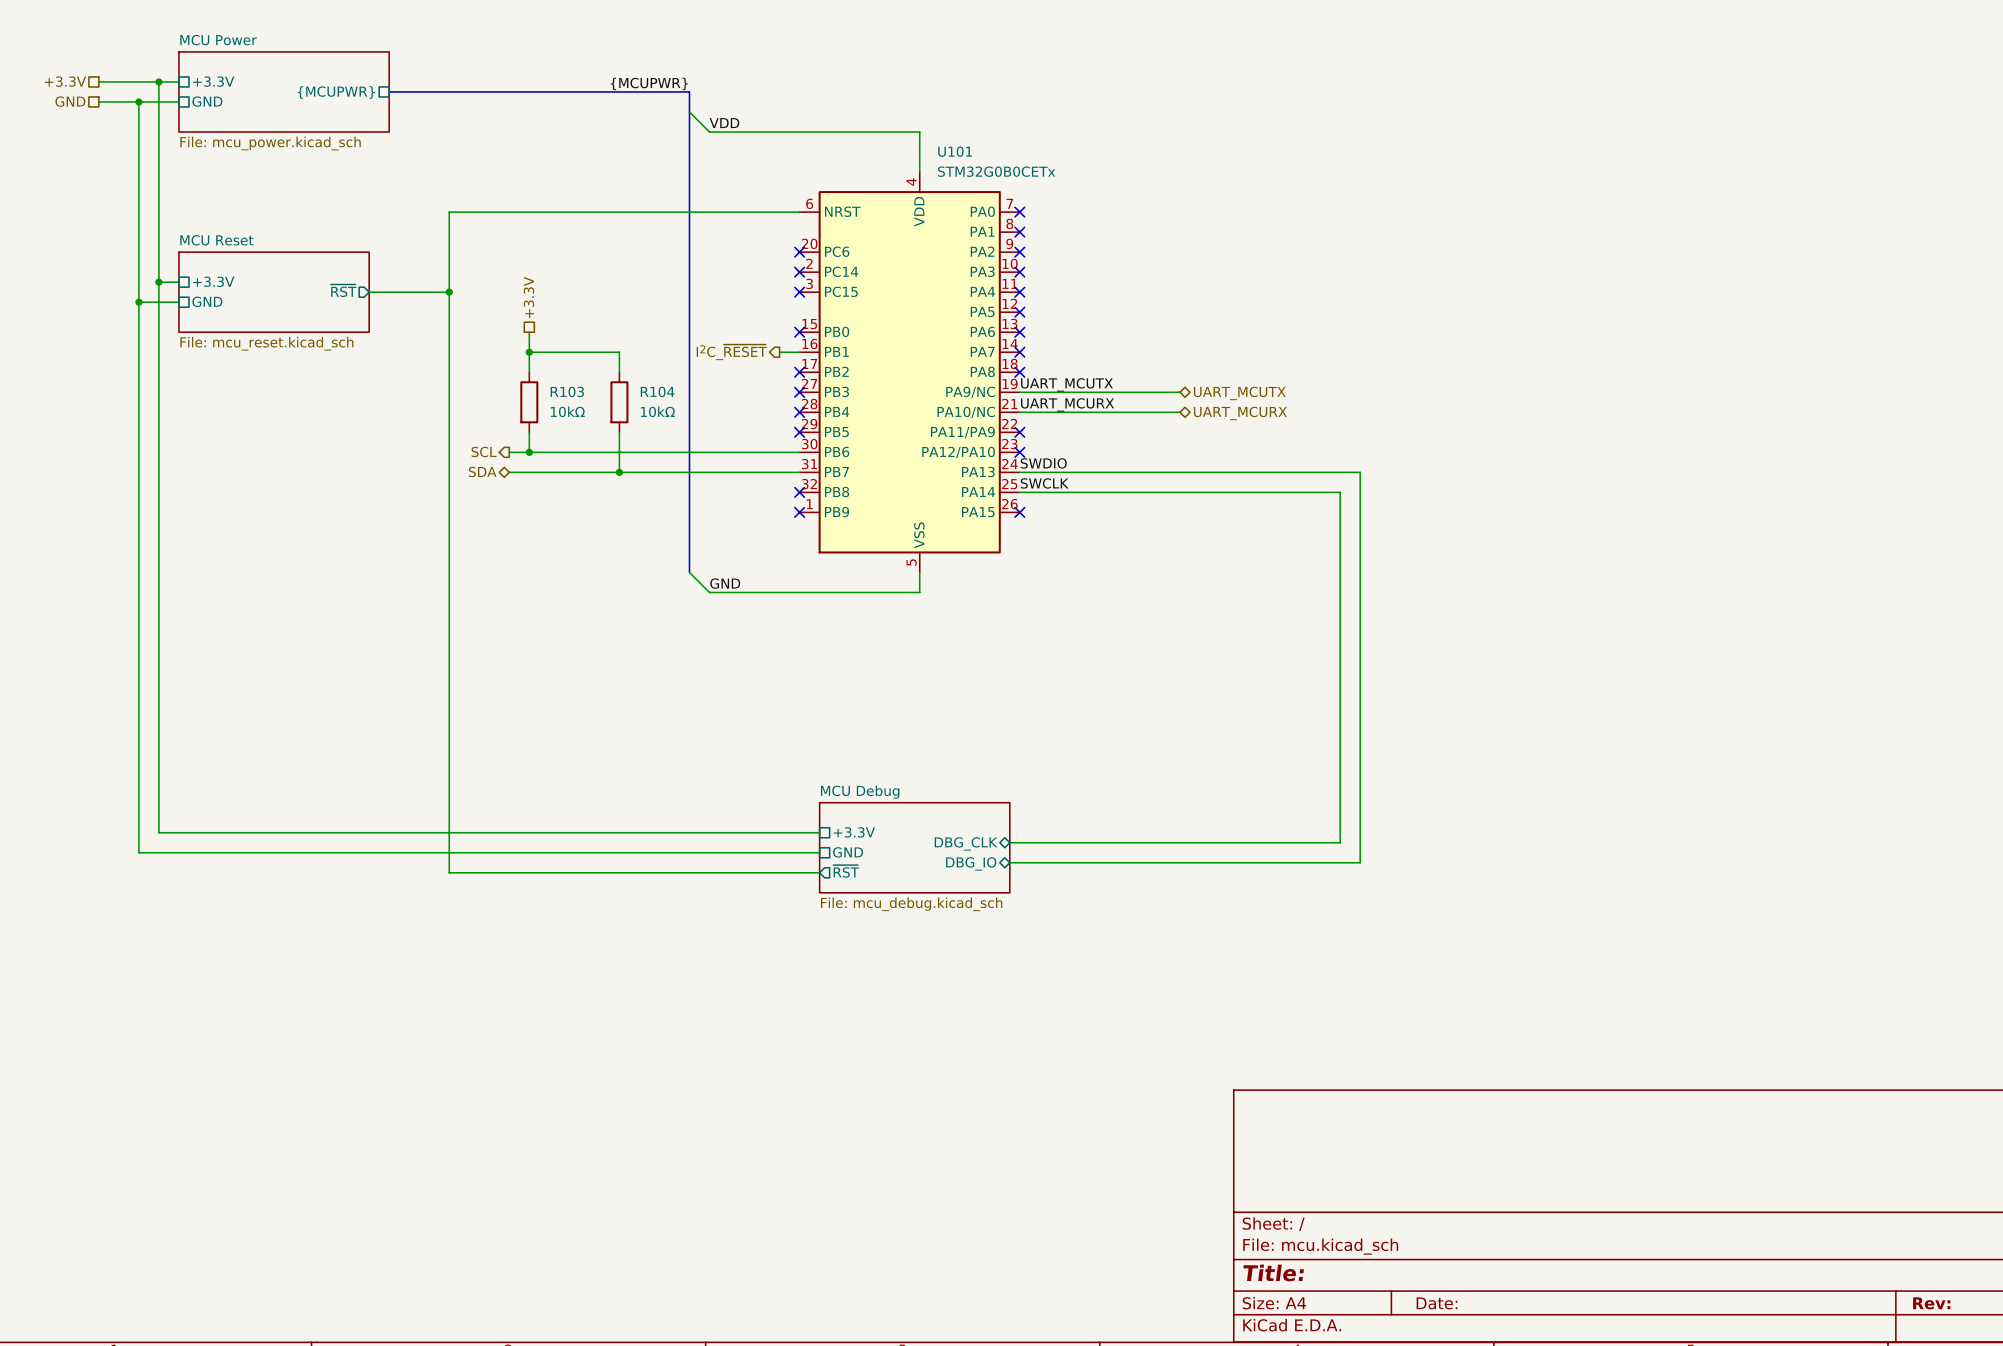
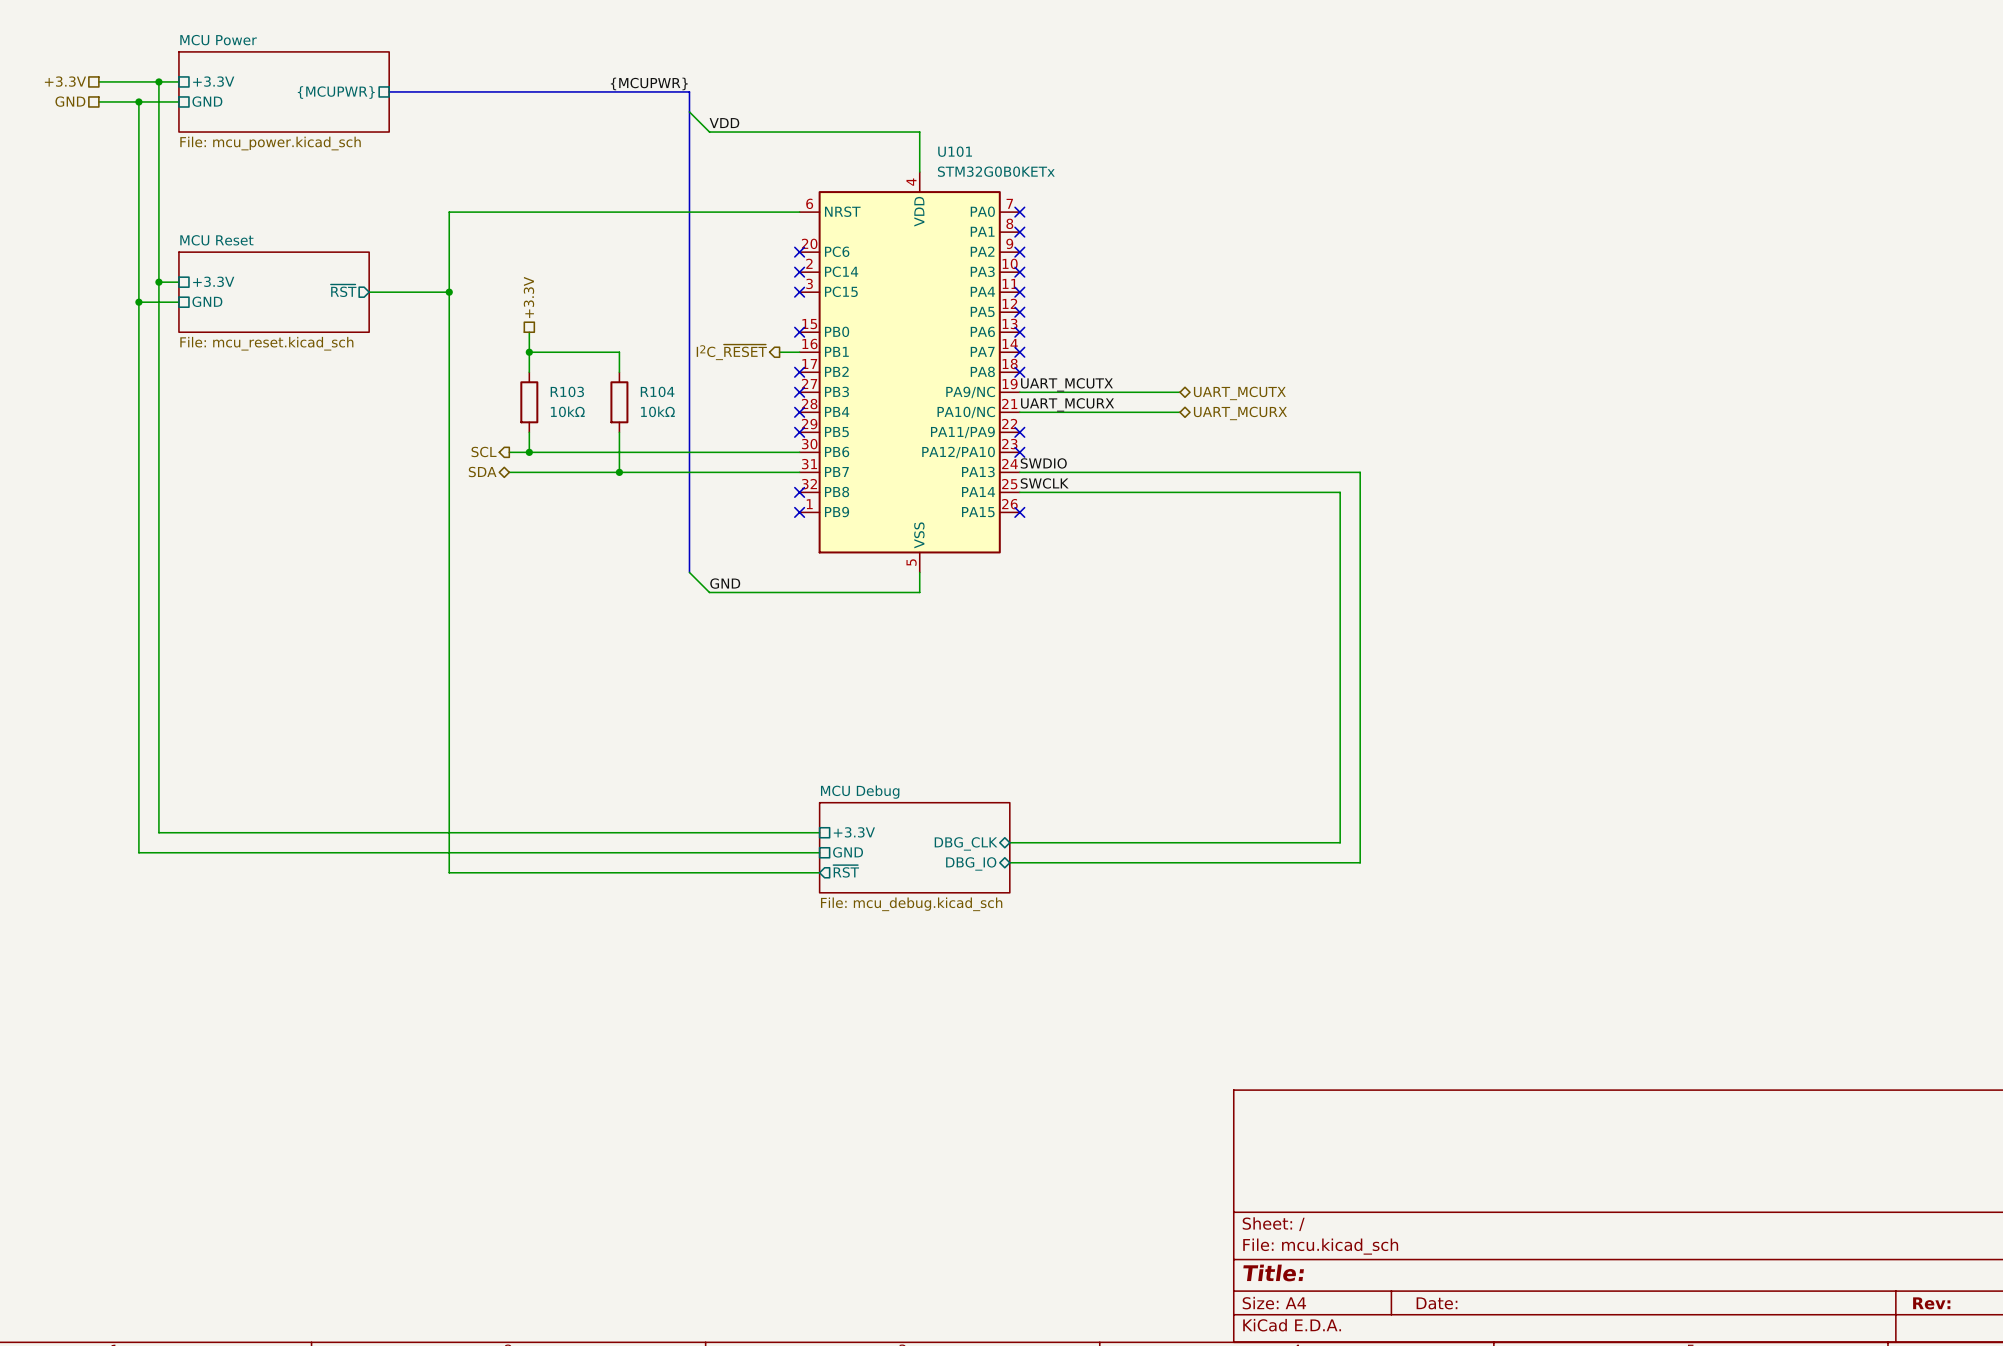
U101 value: STM32G0B0CETx (996, 171) -> STM32G0B0KETx (996, 171)

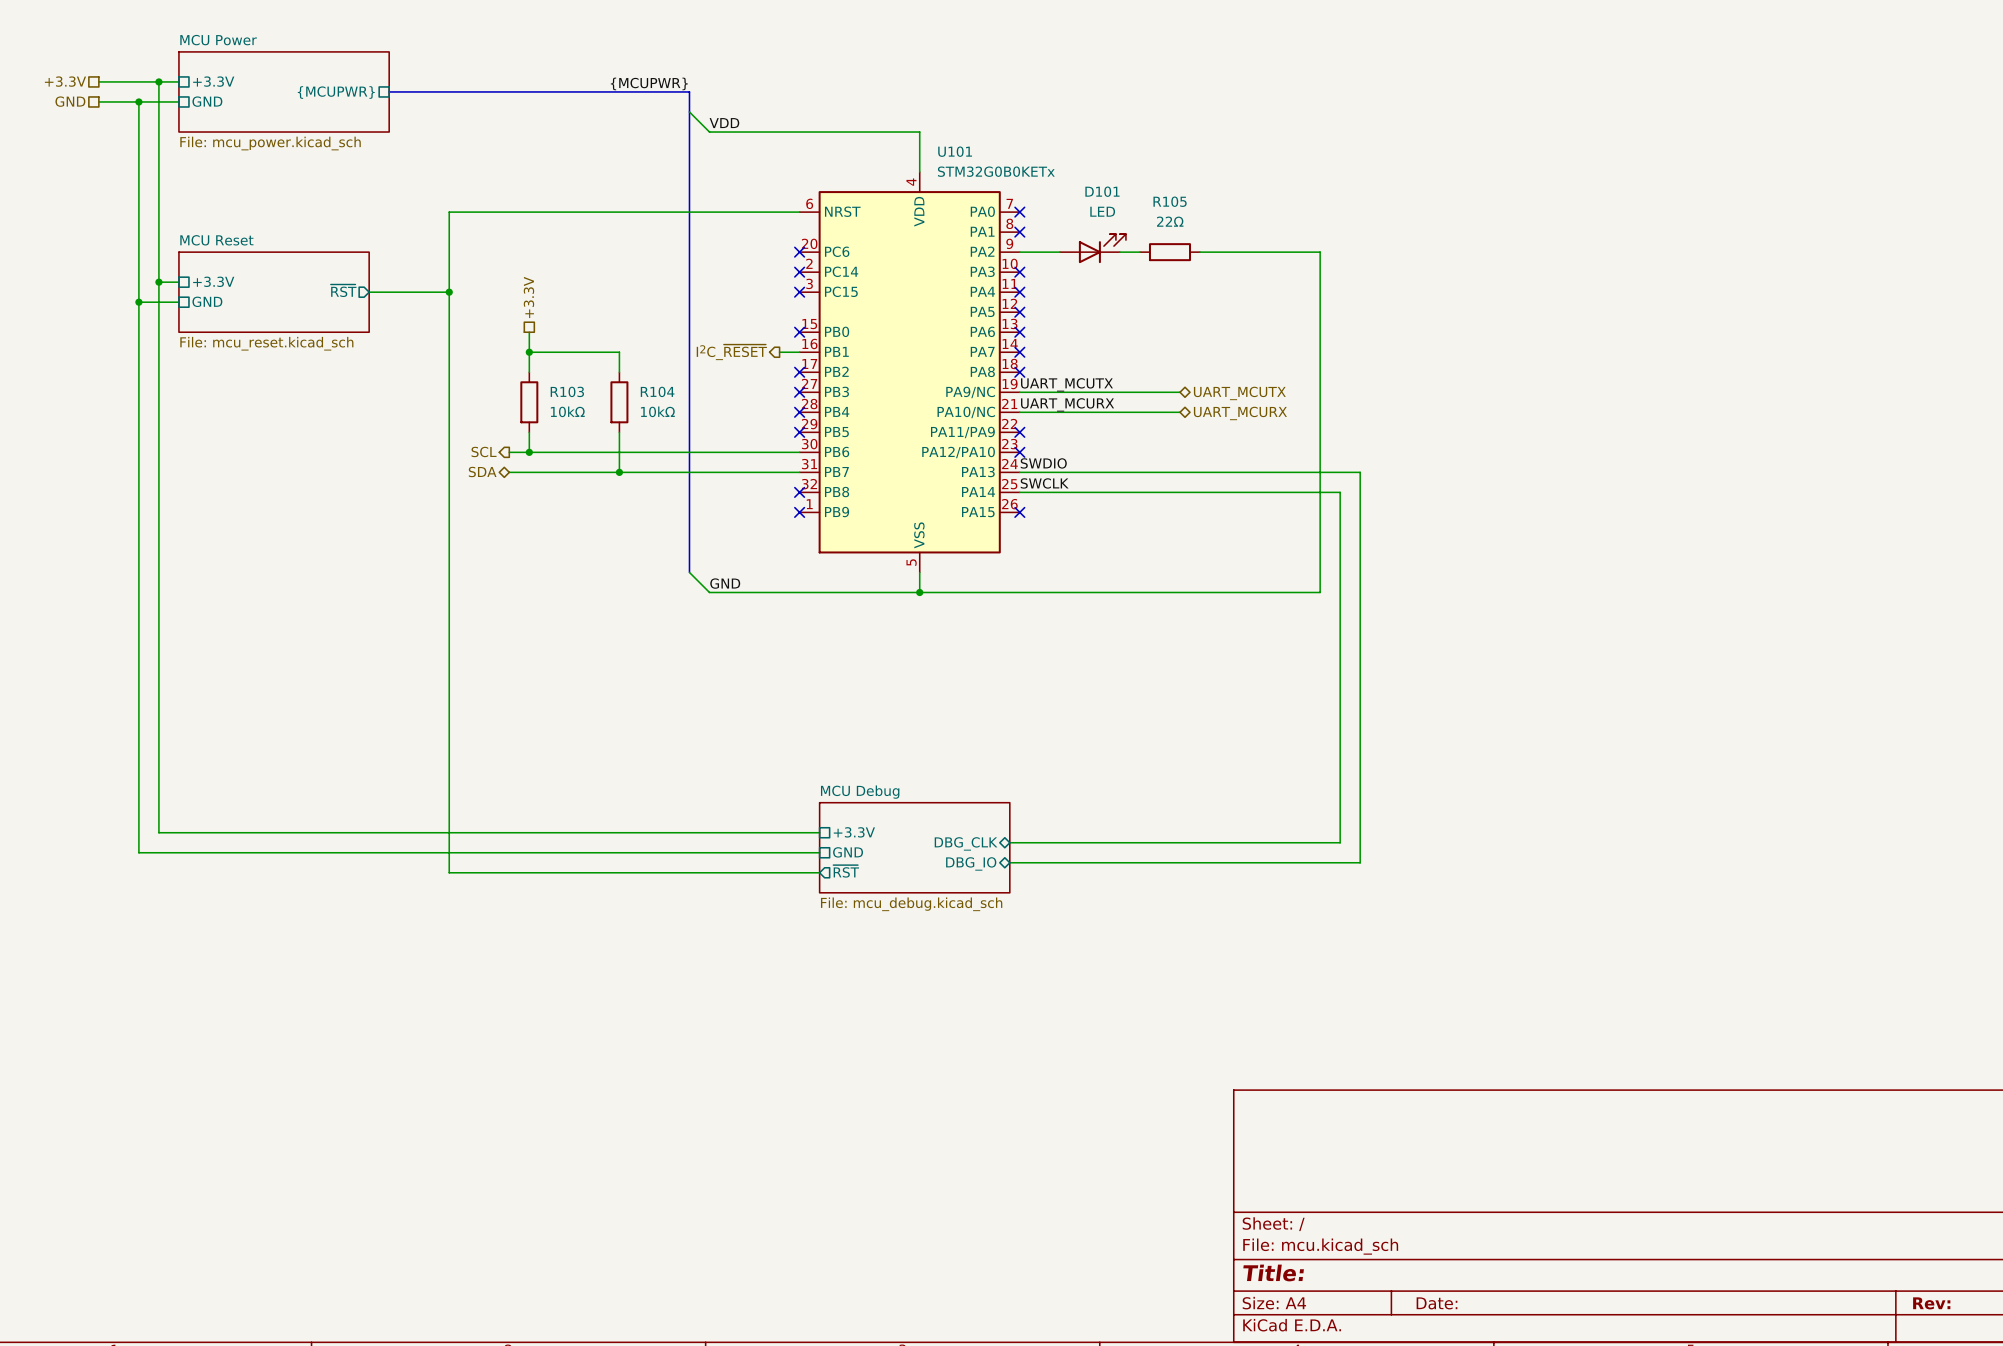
D101: none -> LED (1092, 248)
wire: none -> (1019, 252) (1059, 252)
no-connect mark: (1019, 252) -> none
wire: none -> (1119, 252) (1139, 252)
R105: none -> 22Ω (1169, 252)
wire: none -> (1200, 252) (1320, 252) (1320, 592) (919, 592)
junction: none -> (919, 592)

